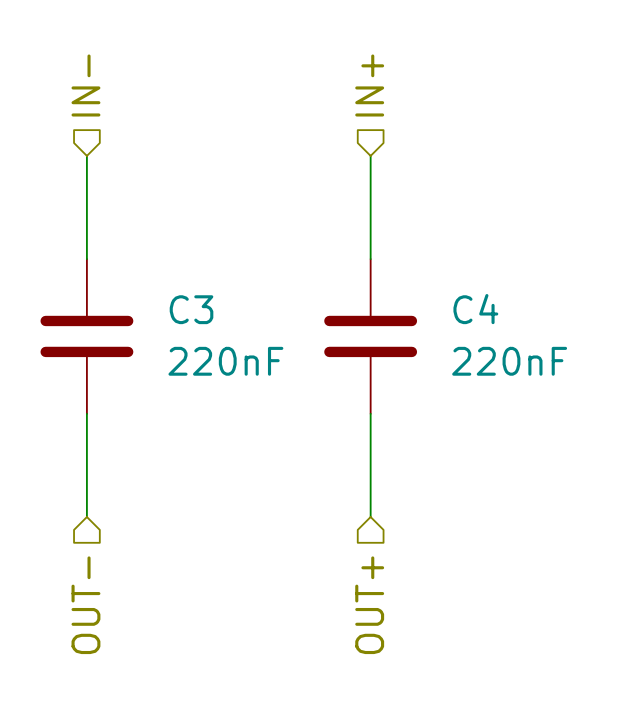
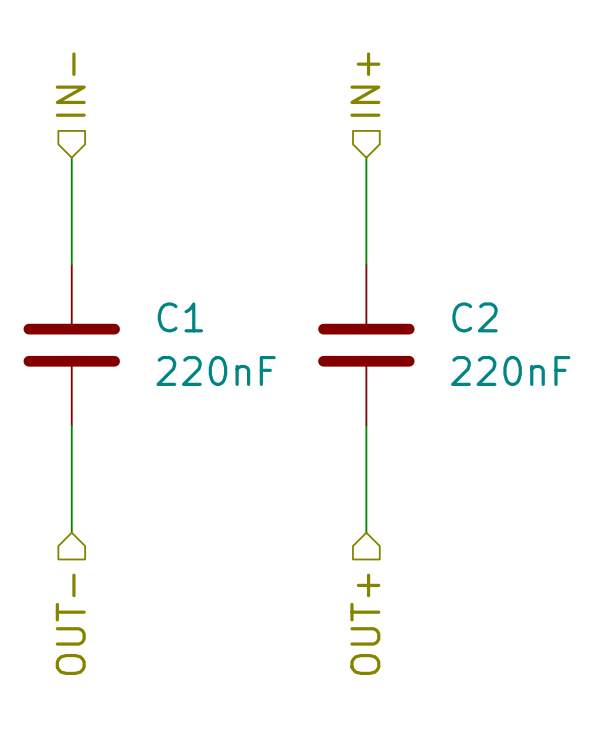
C3 name: C3 (191, 309) -> C1 (180, 317)
C4 name: C4 (475, 309) -> C2 (474, 317)

